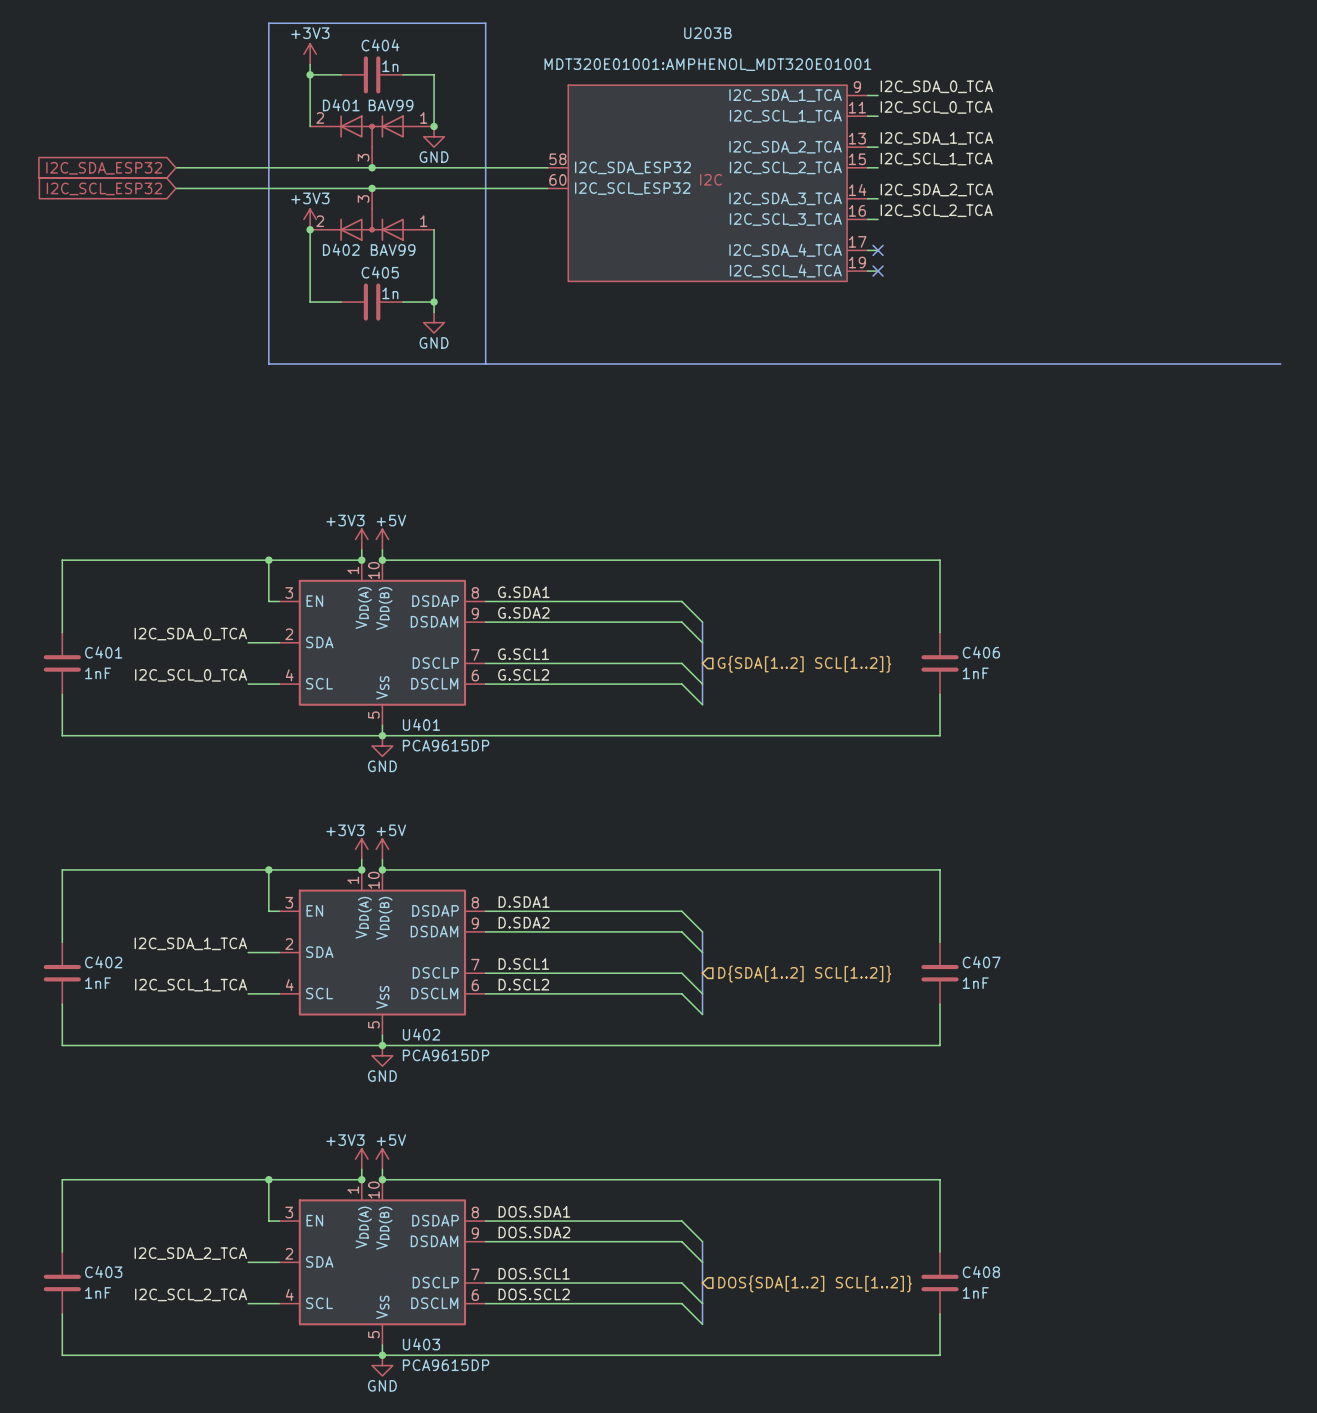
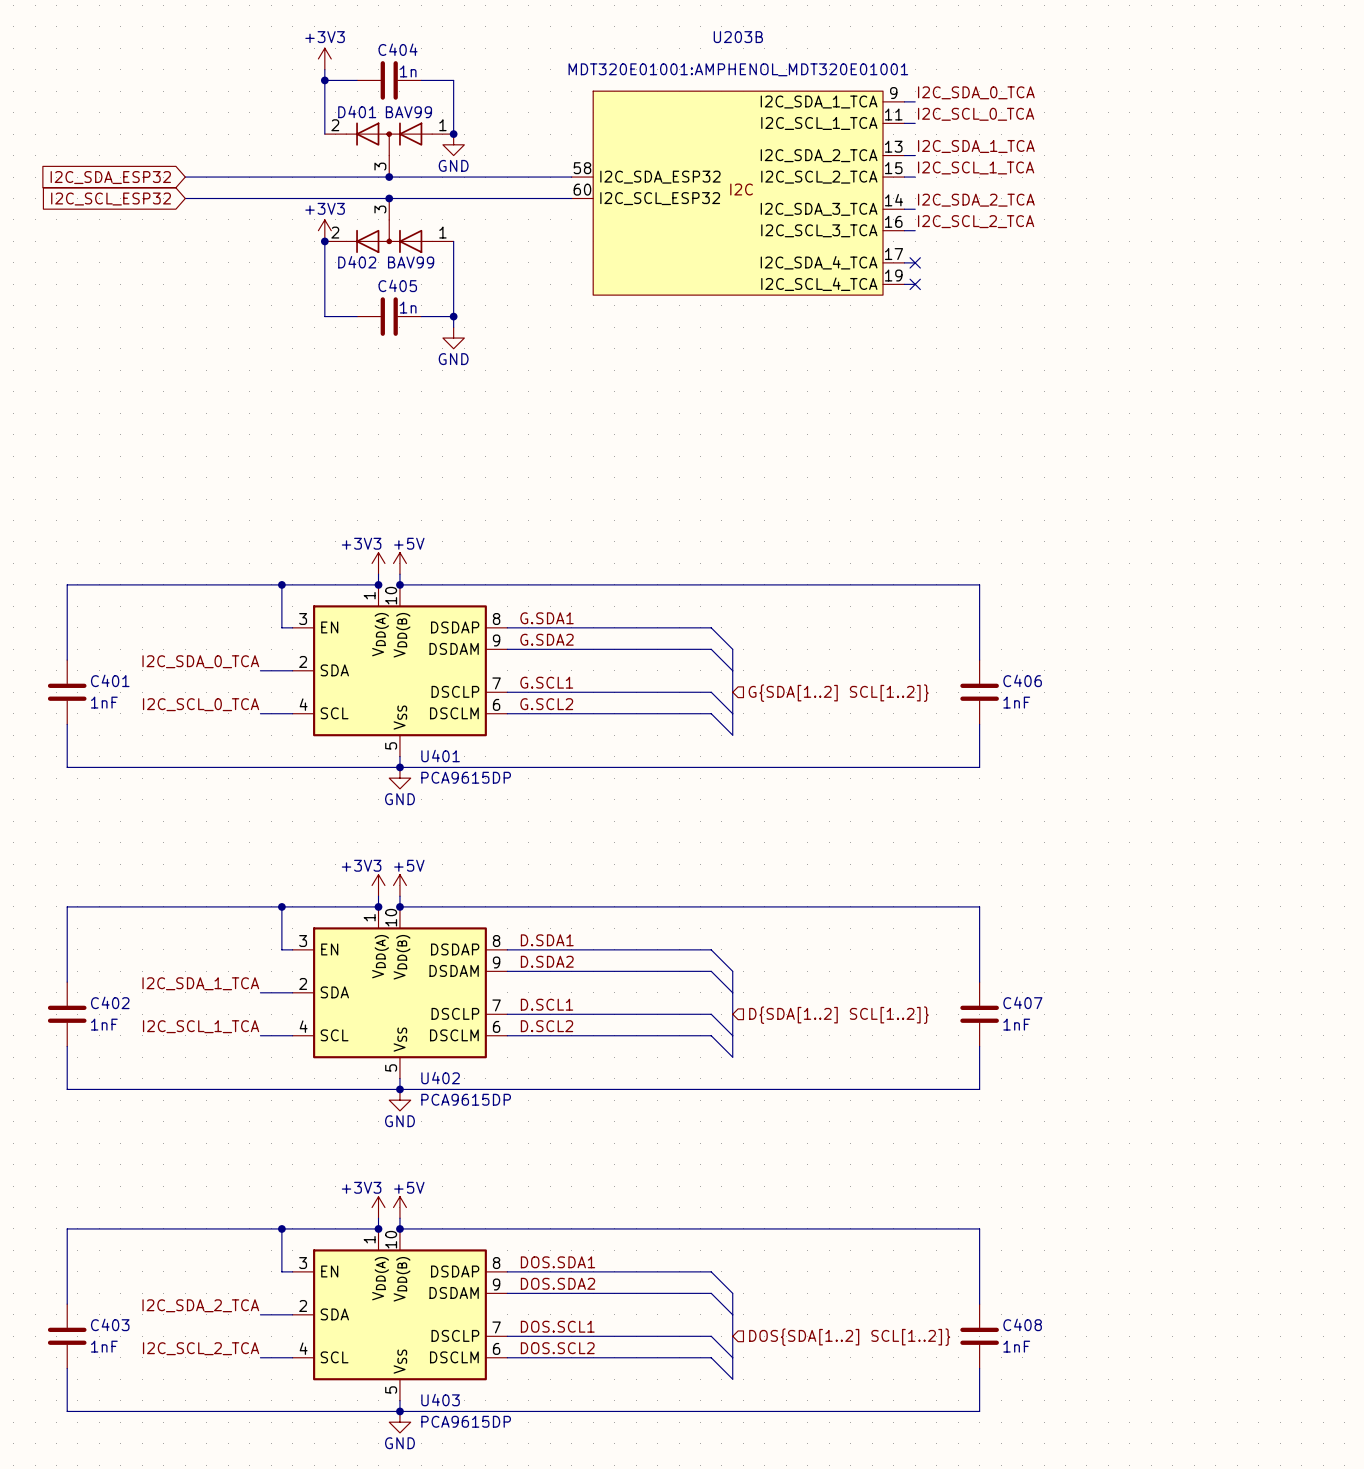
line: (485, 363) (485, 23) (268, 23) (268, 363) (1280, 363) -> none

